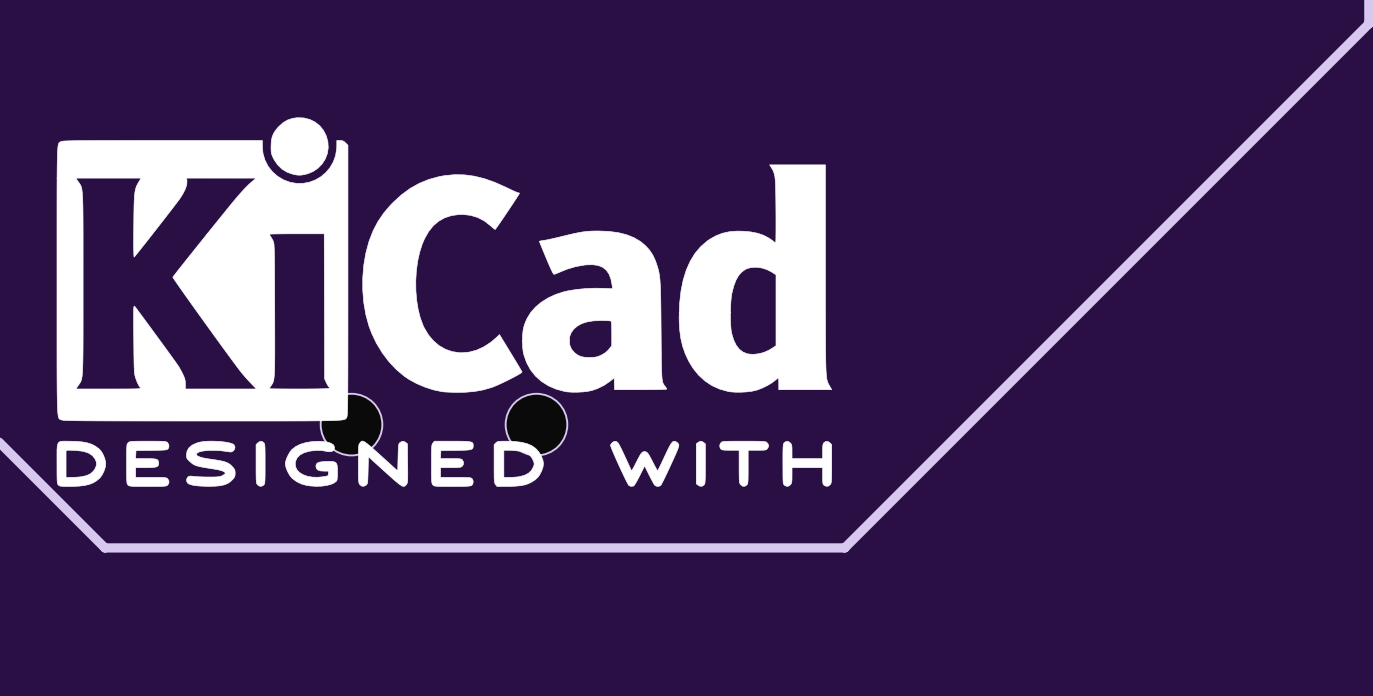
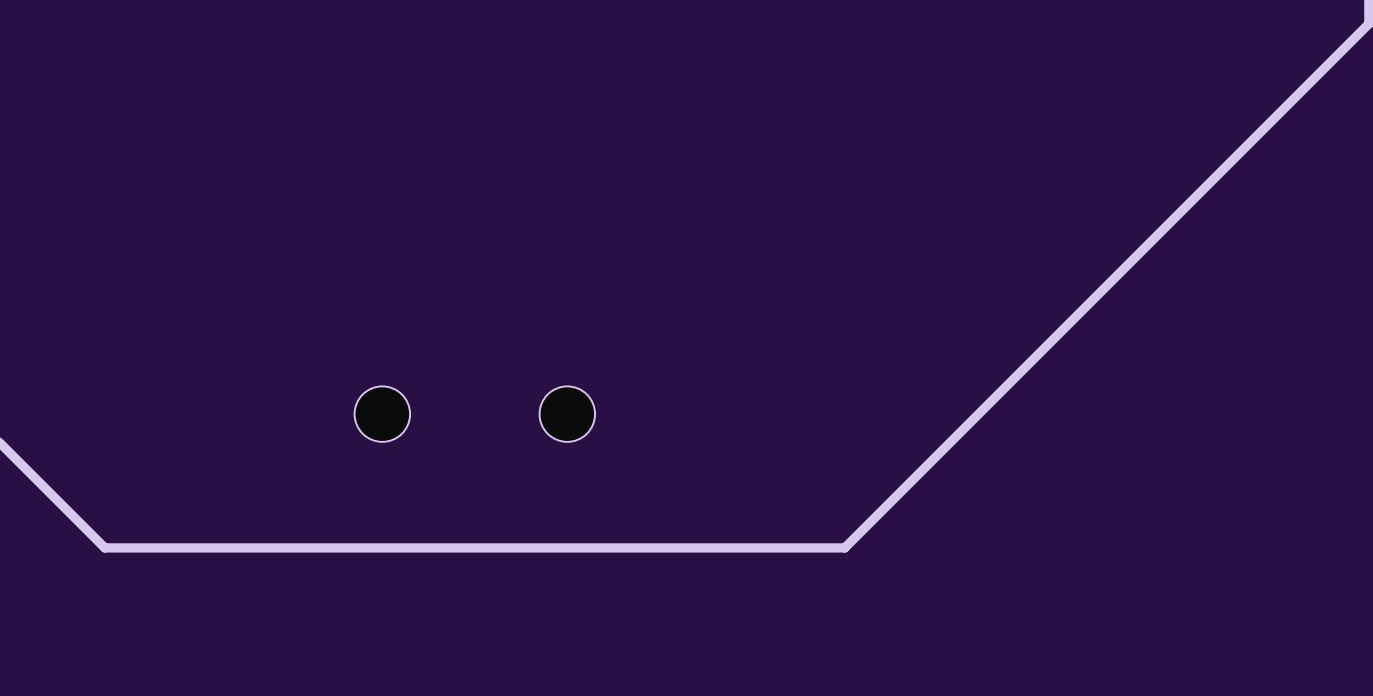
drawing: [56, 117, 833, 487] -> none
part footprint: [320, 393, 568, 456] -> [354, 386, 596, 442]

